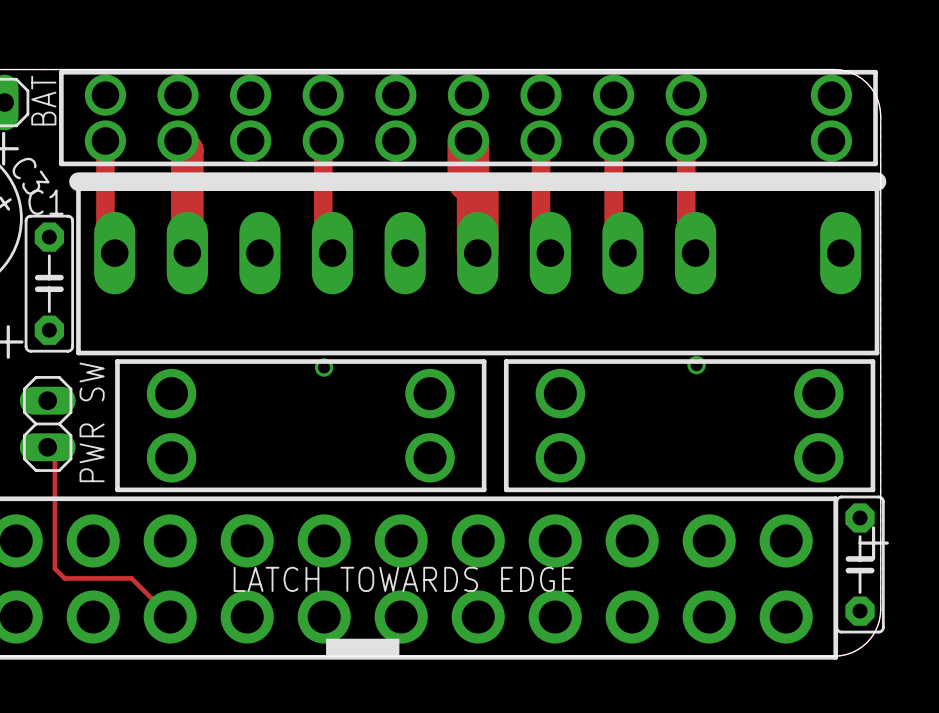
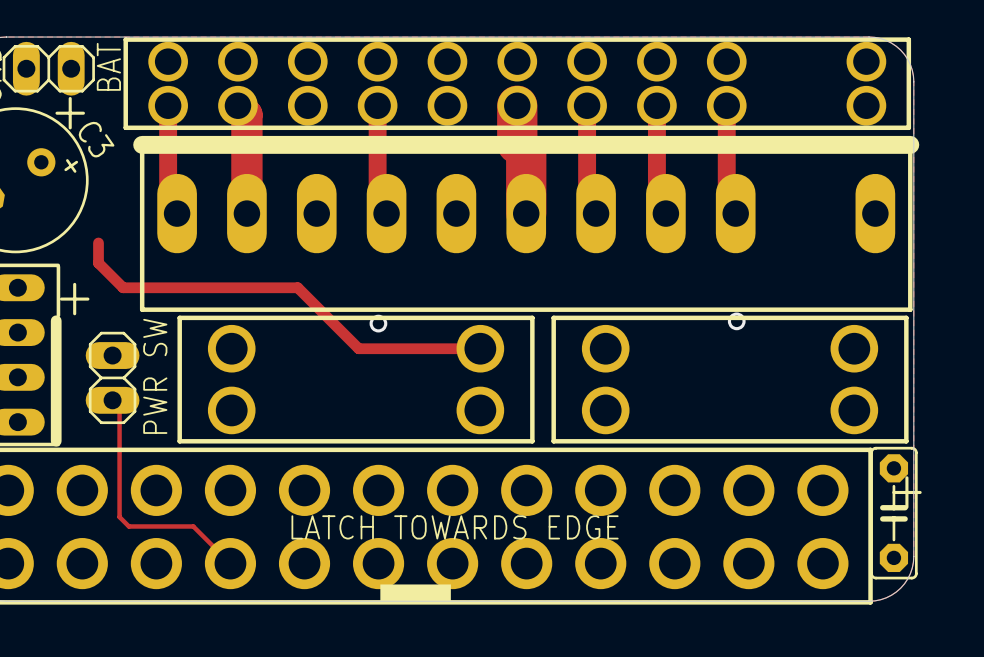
track: none -> (98, 242) (98, 263) (123, 287) (297, 287) (358, 348) (480, 348)
C1: (49, 283) -> none

